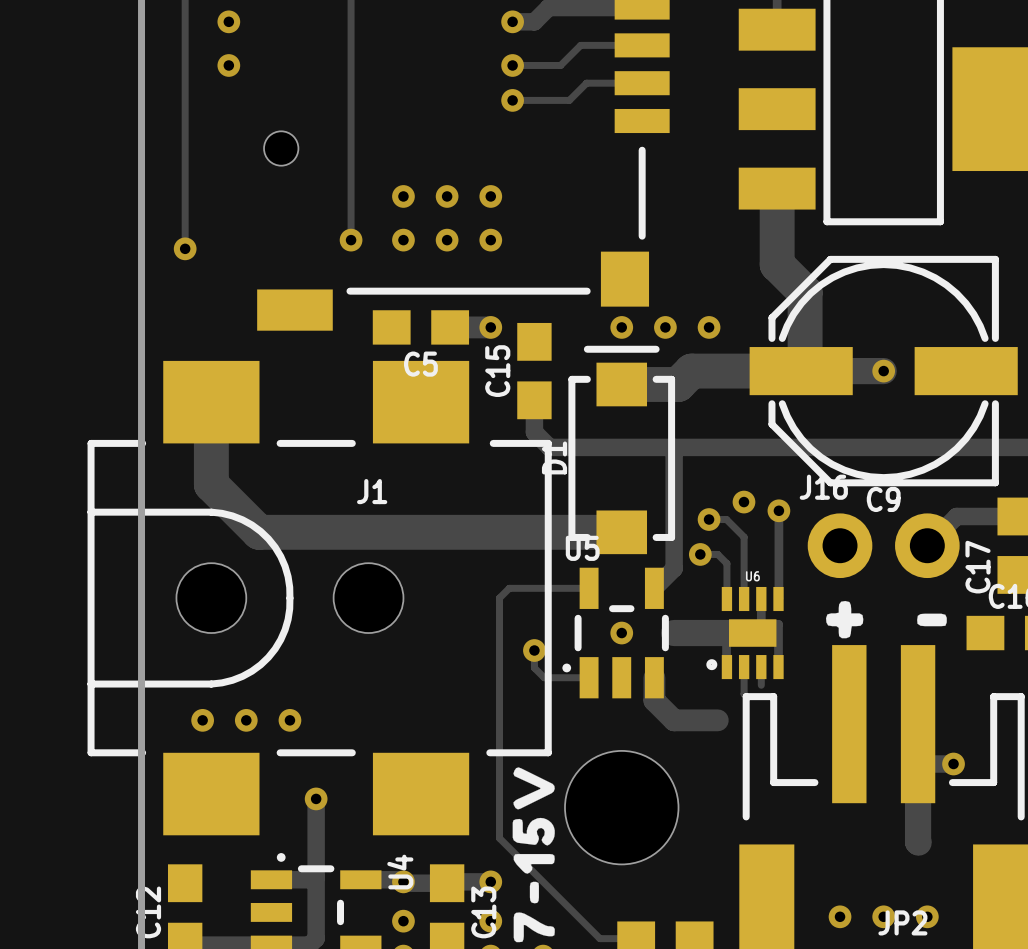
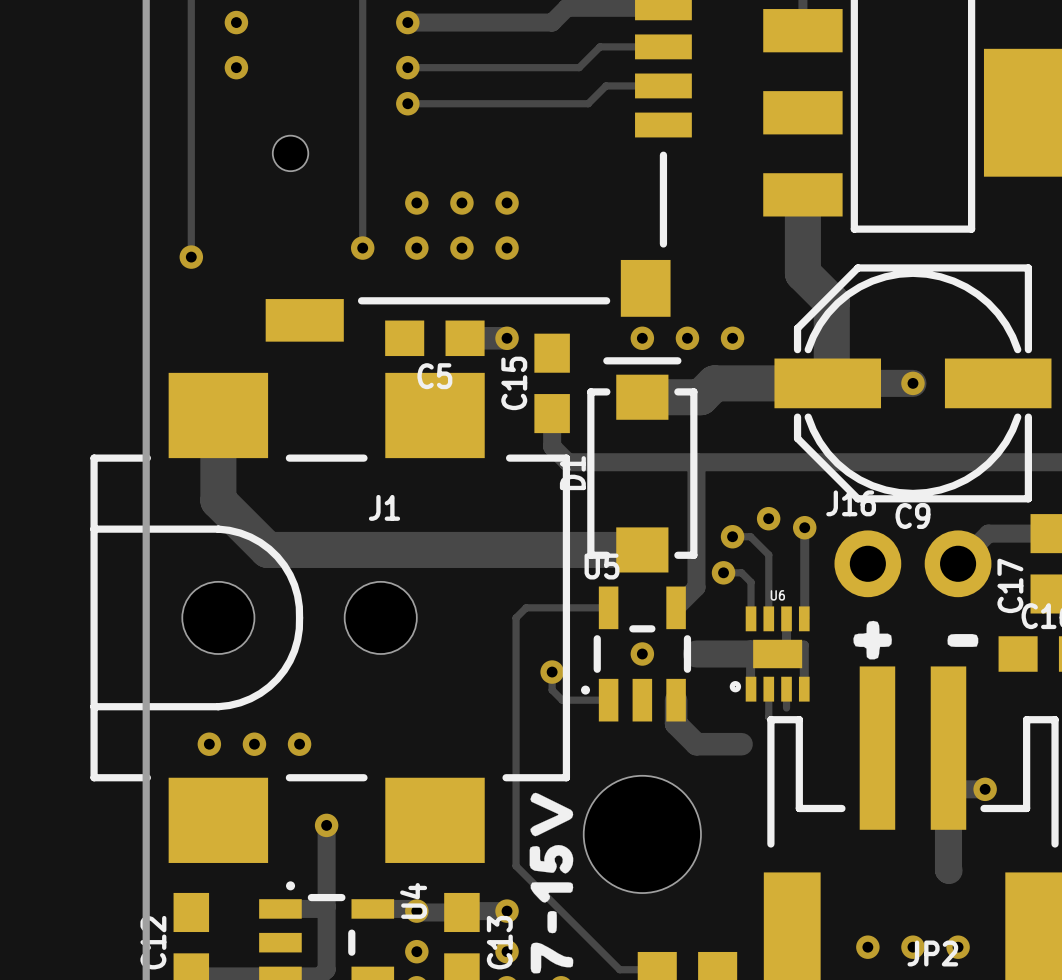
track: none -> (407, 22) (529, 22)
via: none -> (407, 22)
via: (512, 21) -> none
track: none -> (407, 67) (529, 67)
via: none -> (407, 67)
via: (512, 65) -> none
track: none -> (407, 103) (529, 103)
via: none -> (407, 103)
via: (512, 100) -> none

